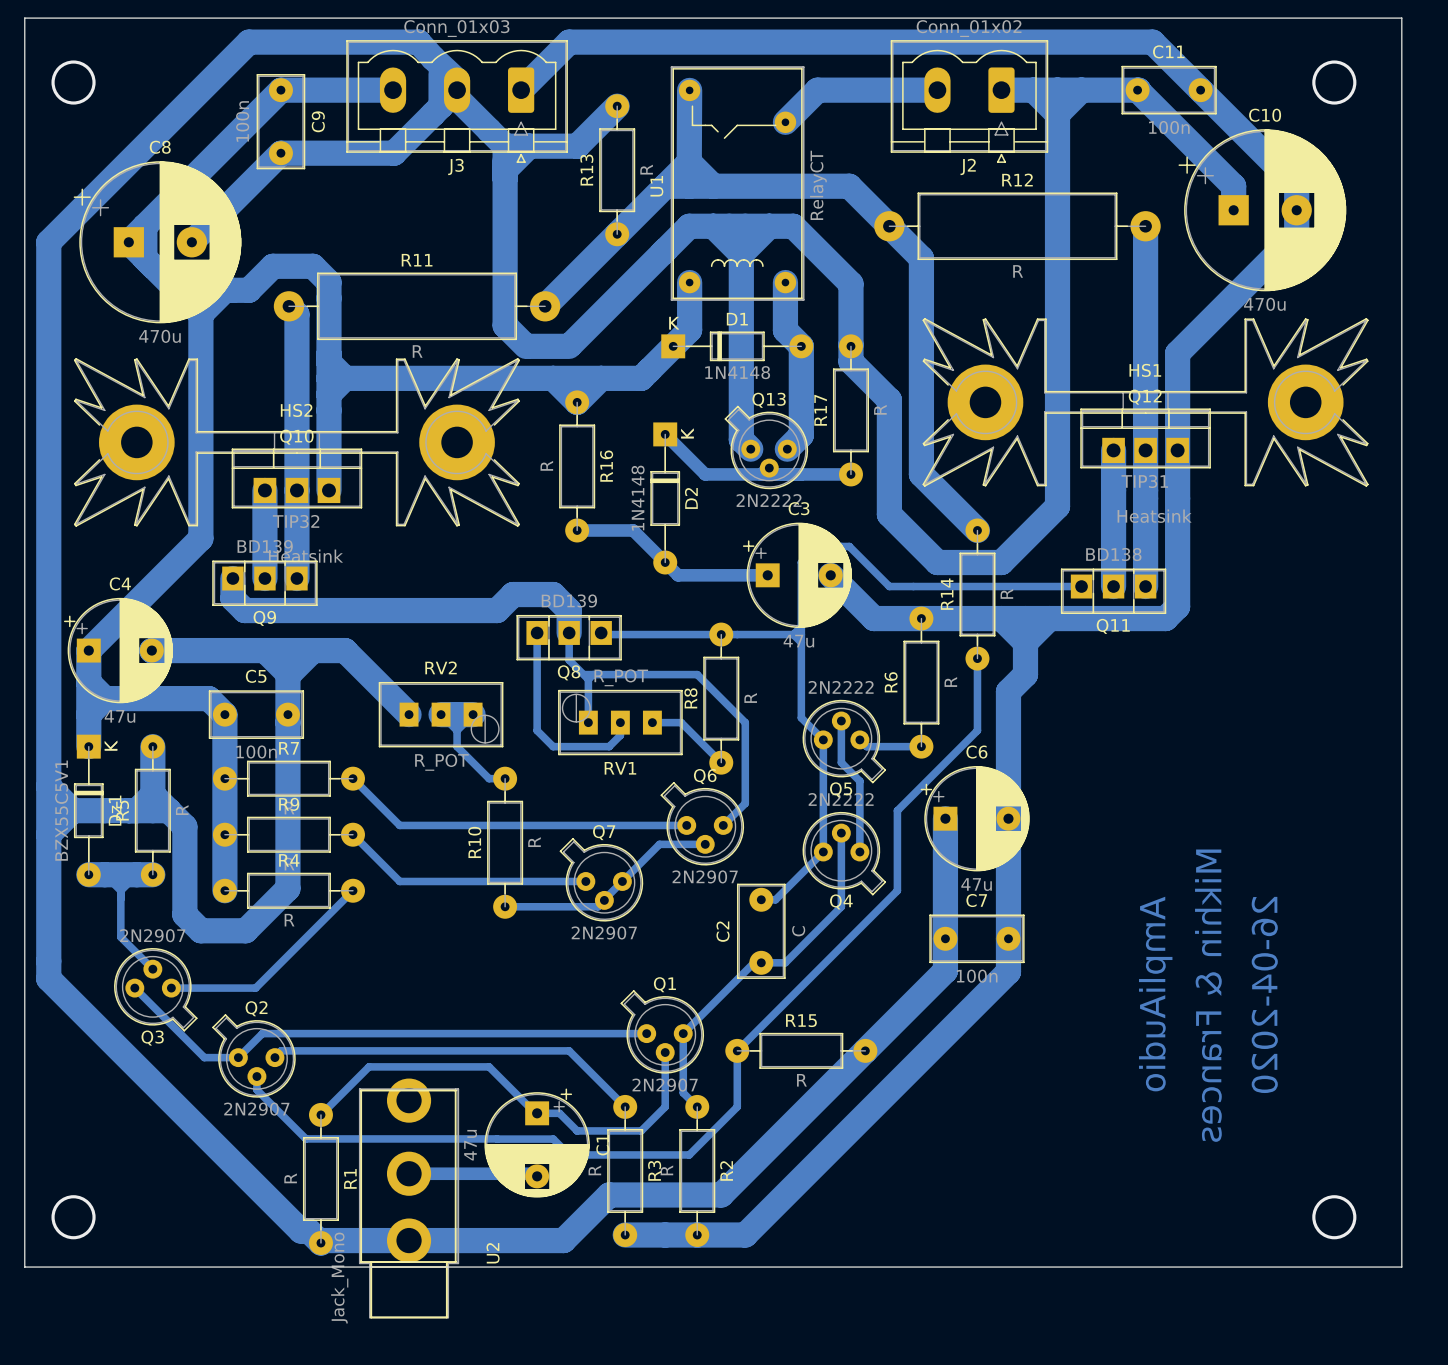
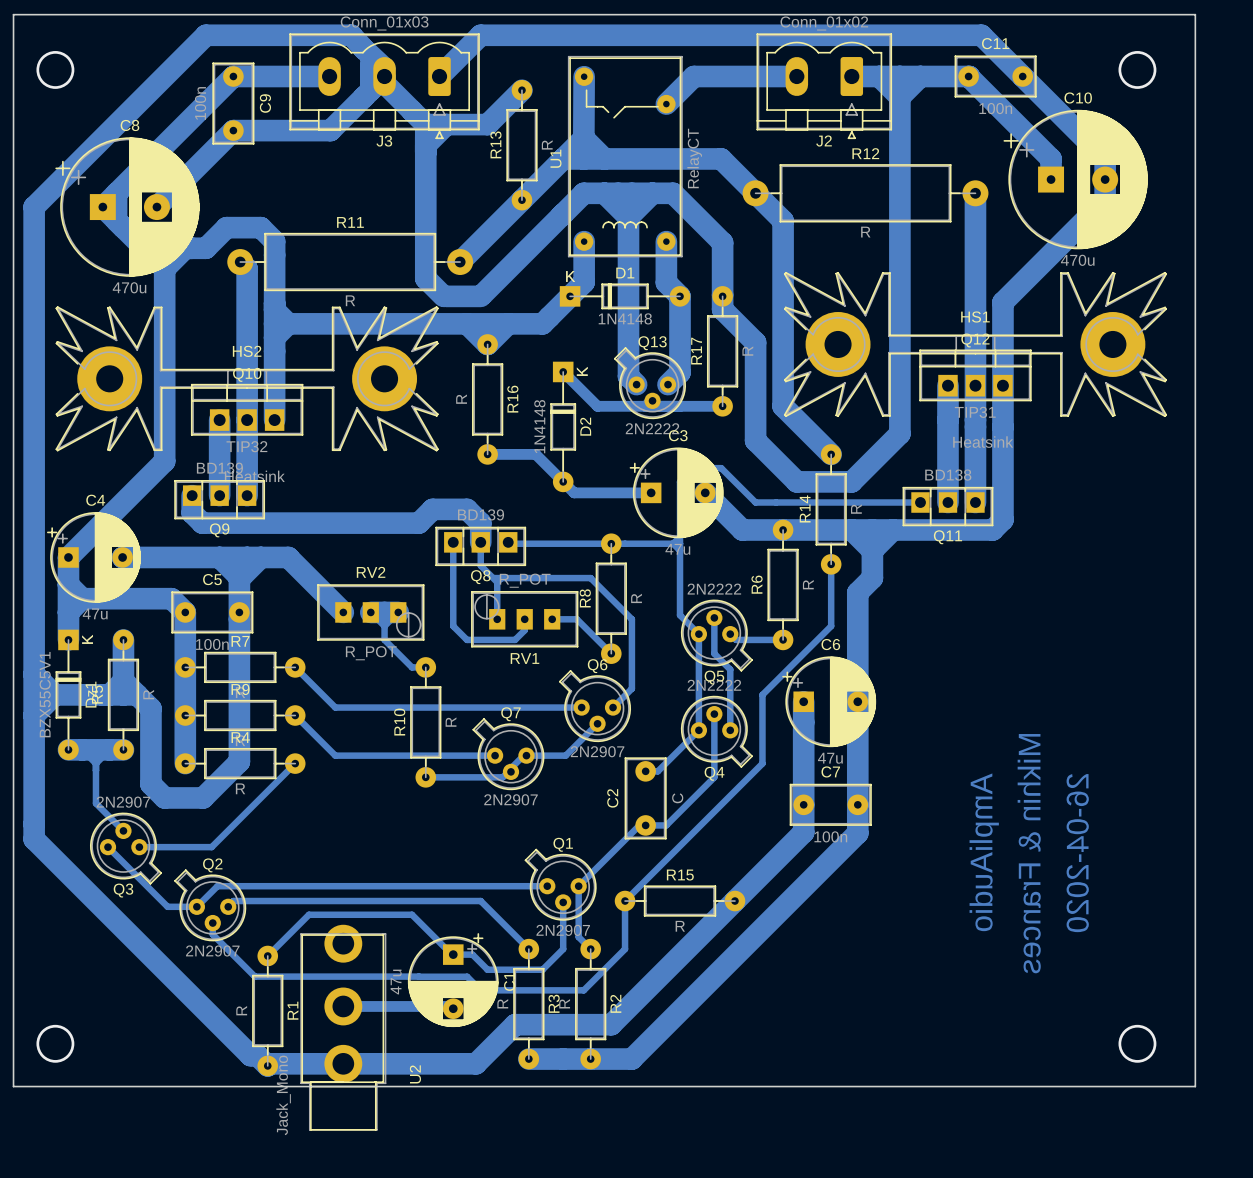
bottom track: (705, 844) (659, 844) (598, 906) (594, 906) -> (597, 723) (565, 755) (523, 755) (502, 777)

